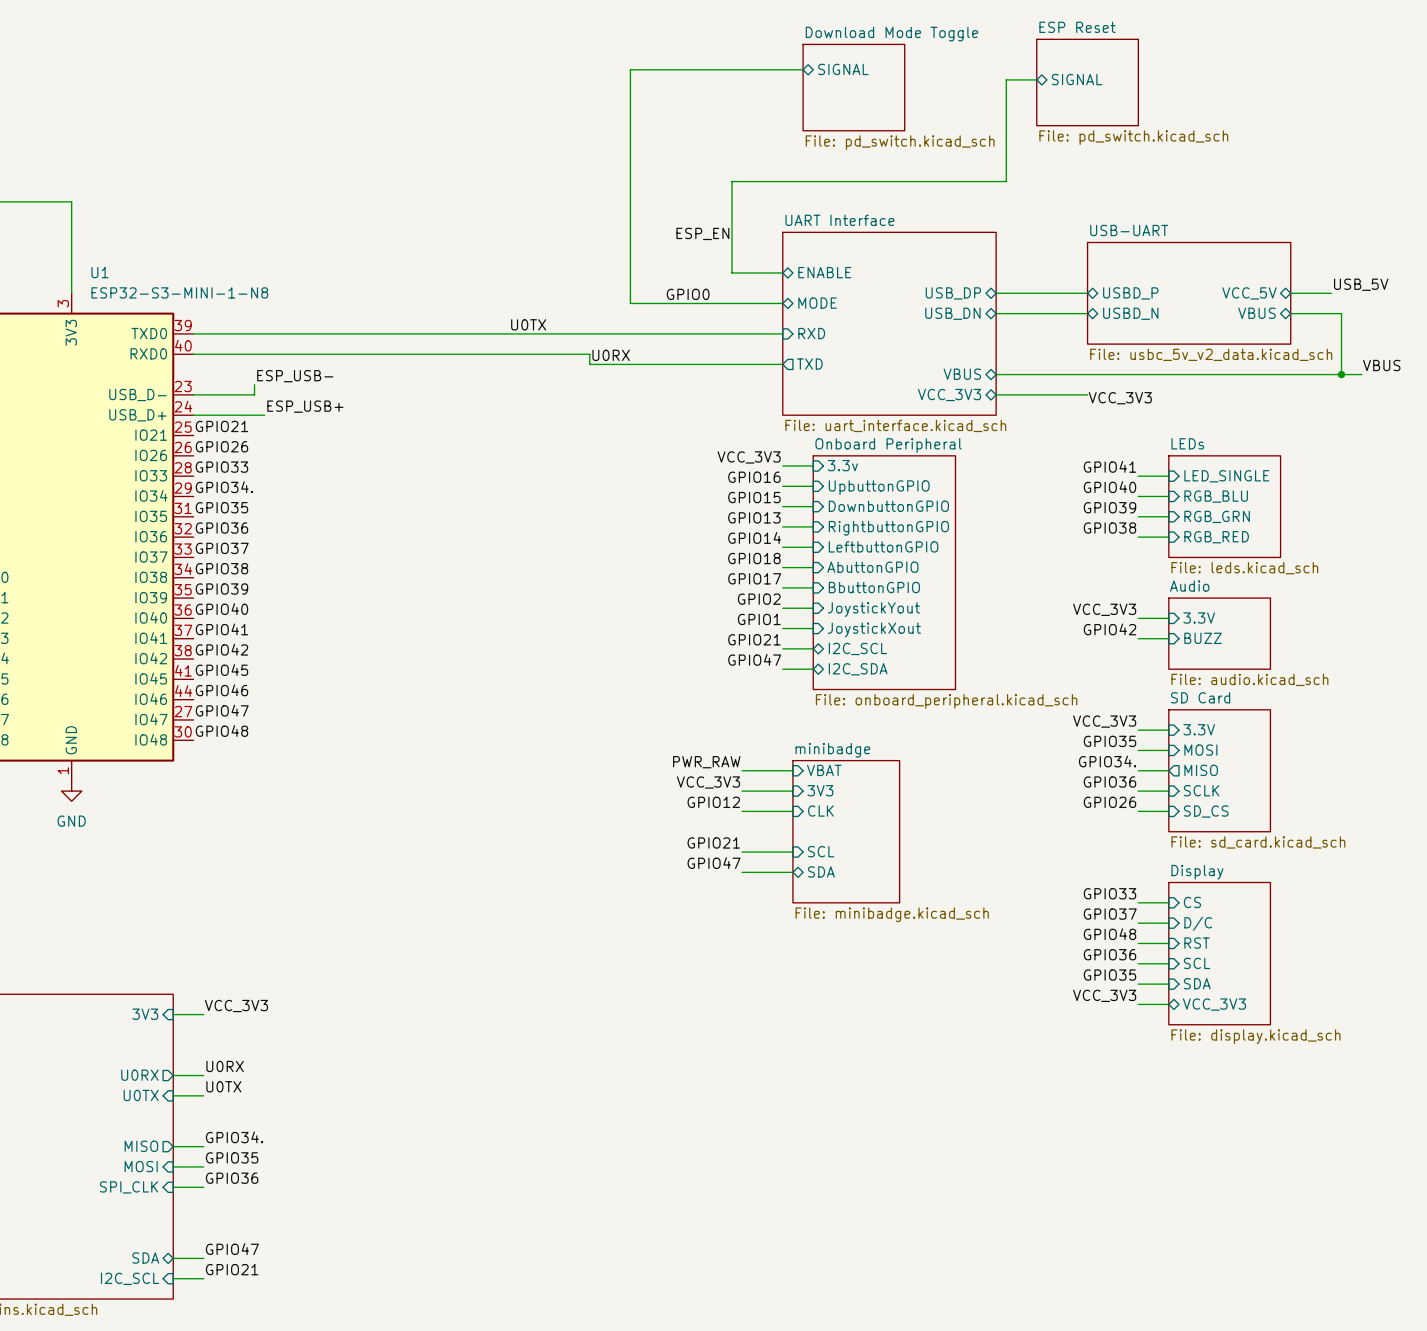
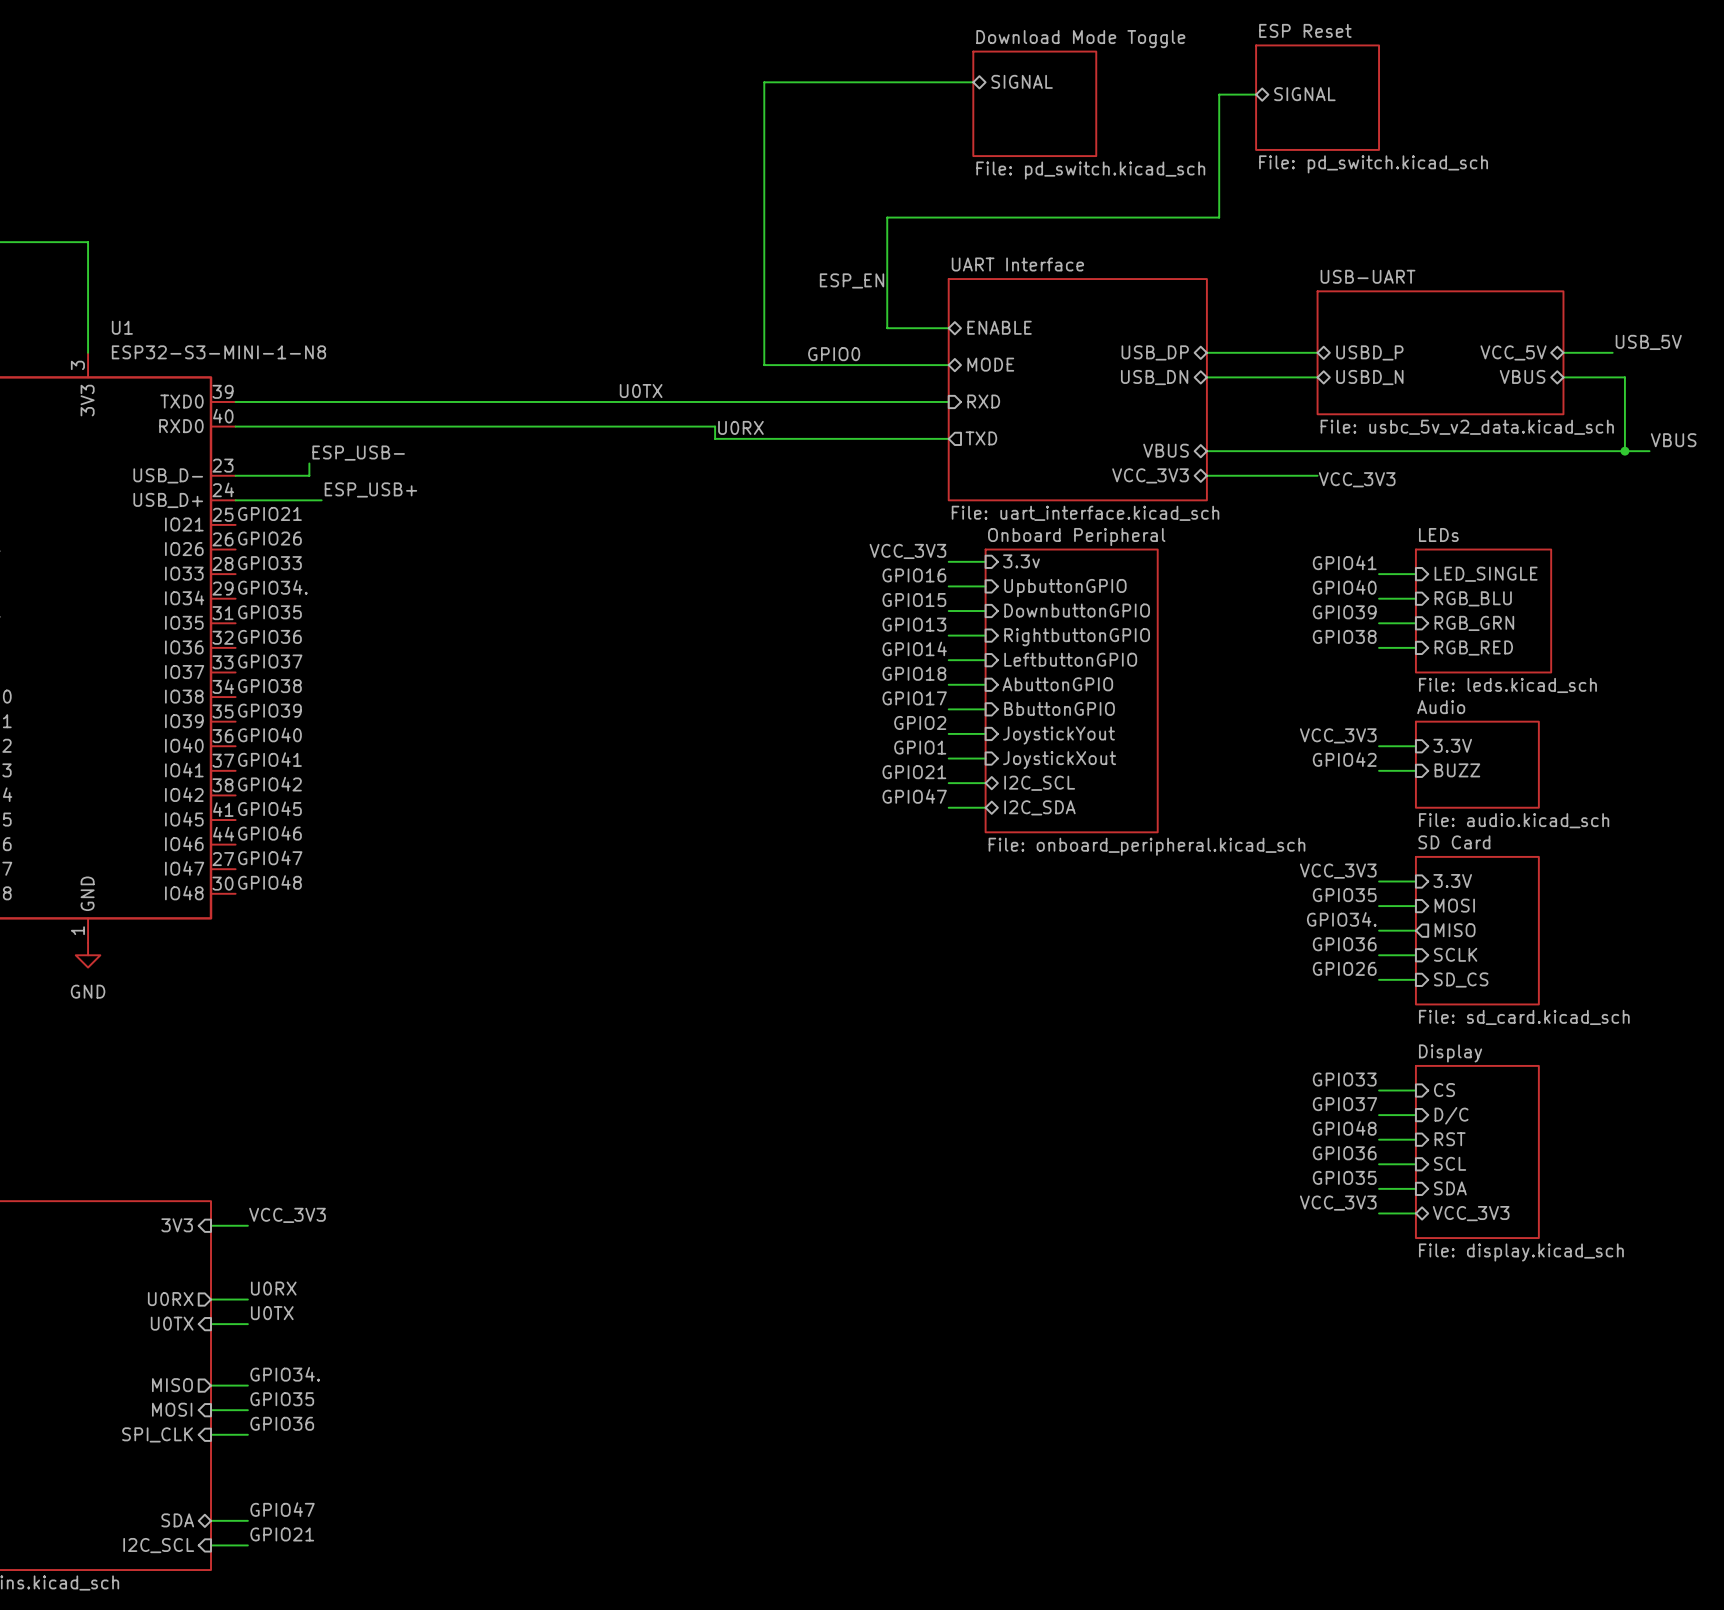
label: PWR_RAW (706, 762) -> none
wire: (742, 770) (792, 770) -> none
sheet pin: VBAT (824, 770) -> none
label: VCC_3V3 (708, 782) -> none
sheet pin: 3V3 (820, 790) -> none
wire: (742, 791) (792, 791) -> none
label: GPIO12 (713, 802) -> none
wire: (742, 811) (792, 811) -> none
sheet pin: CLK (820, 811) -> none
sheet minibadge: File: minibadge.kicad_sch (846, 831) -> none
label: GPIO21 (713, 842) -> none
sheet pin: SCL (821, 851) -> none
wire: (742, 852) (792, 852) -> none
label: GPIO47 (714, 863) -> none
sheet pin: SDA (821, 871) -> none
wire: (742, 872) (792, 872) -> none

